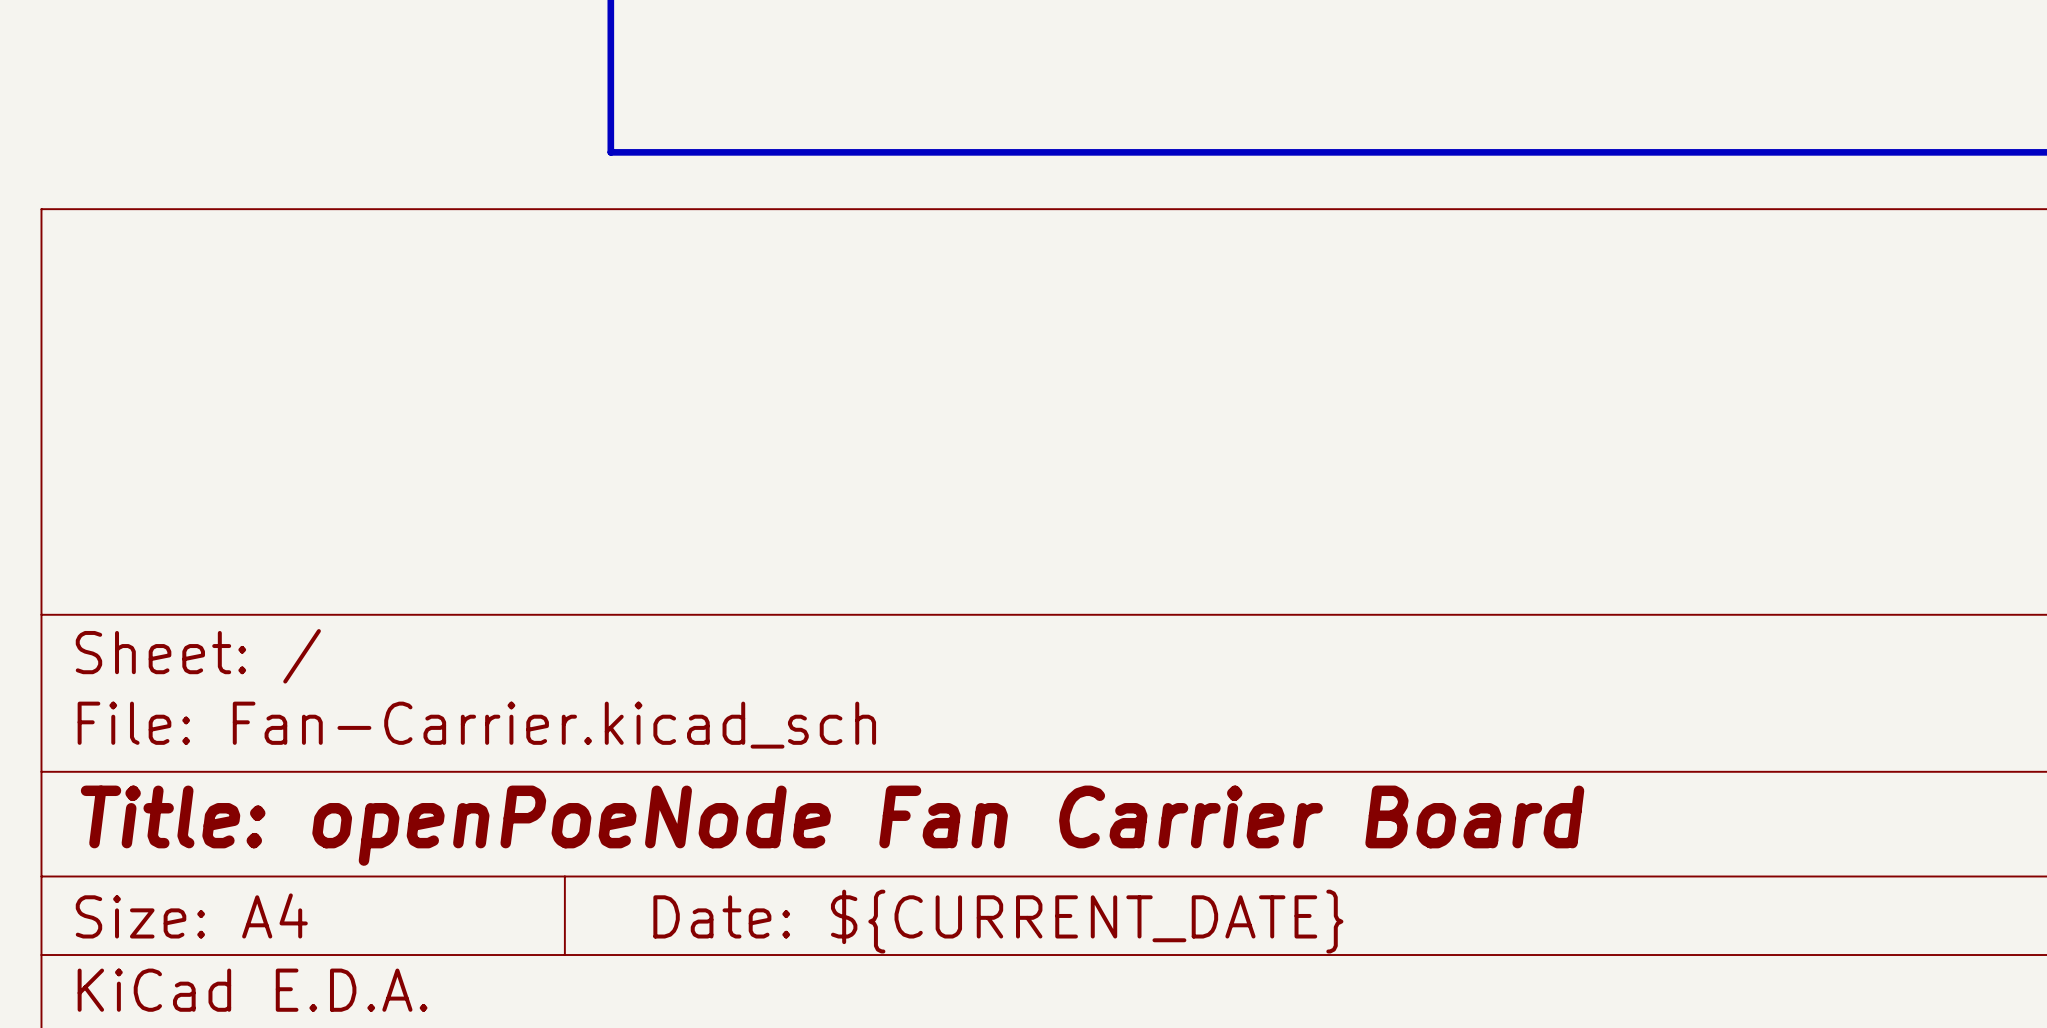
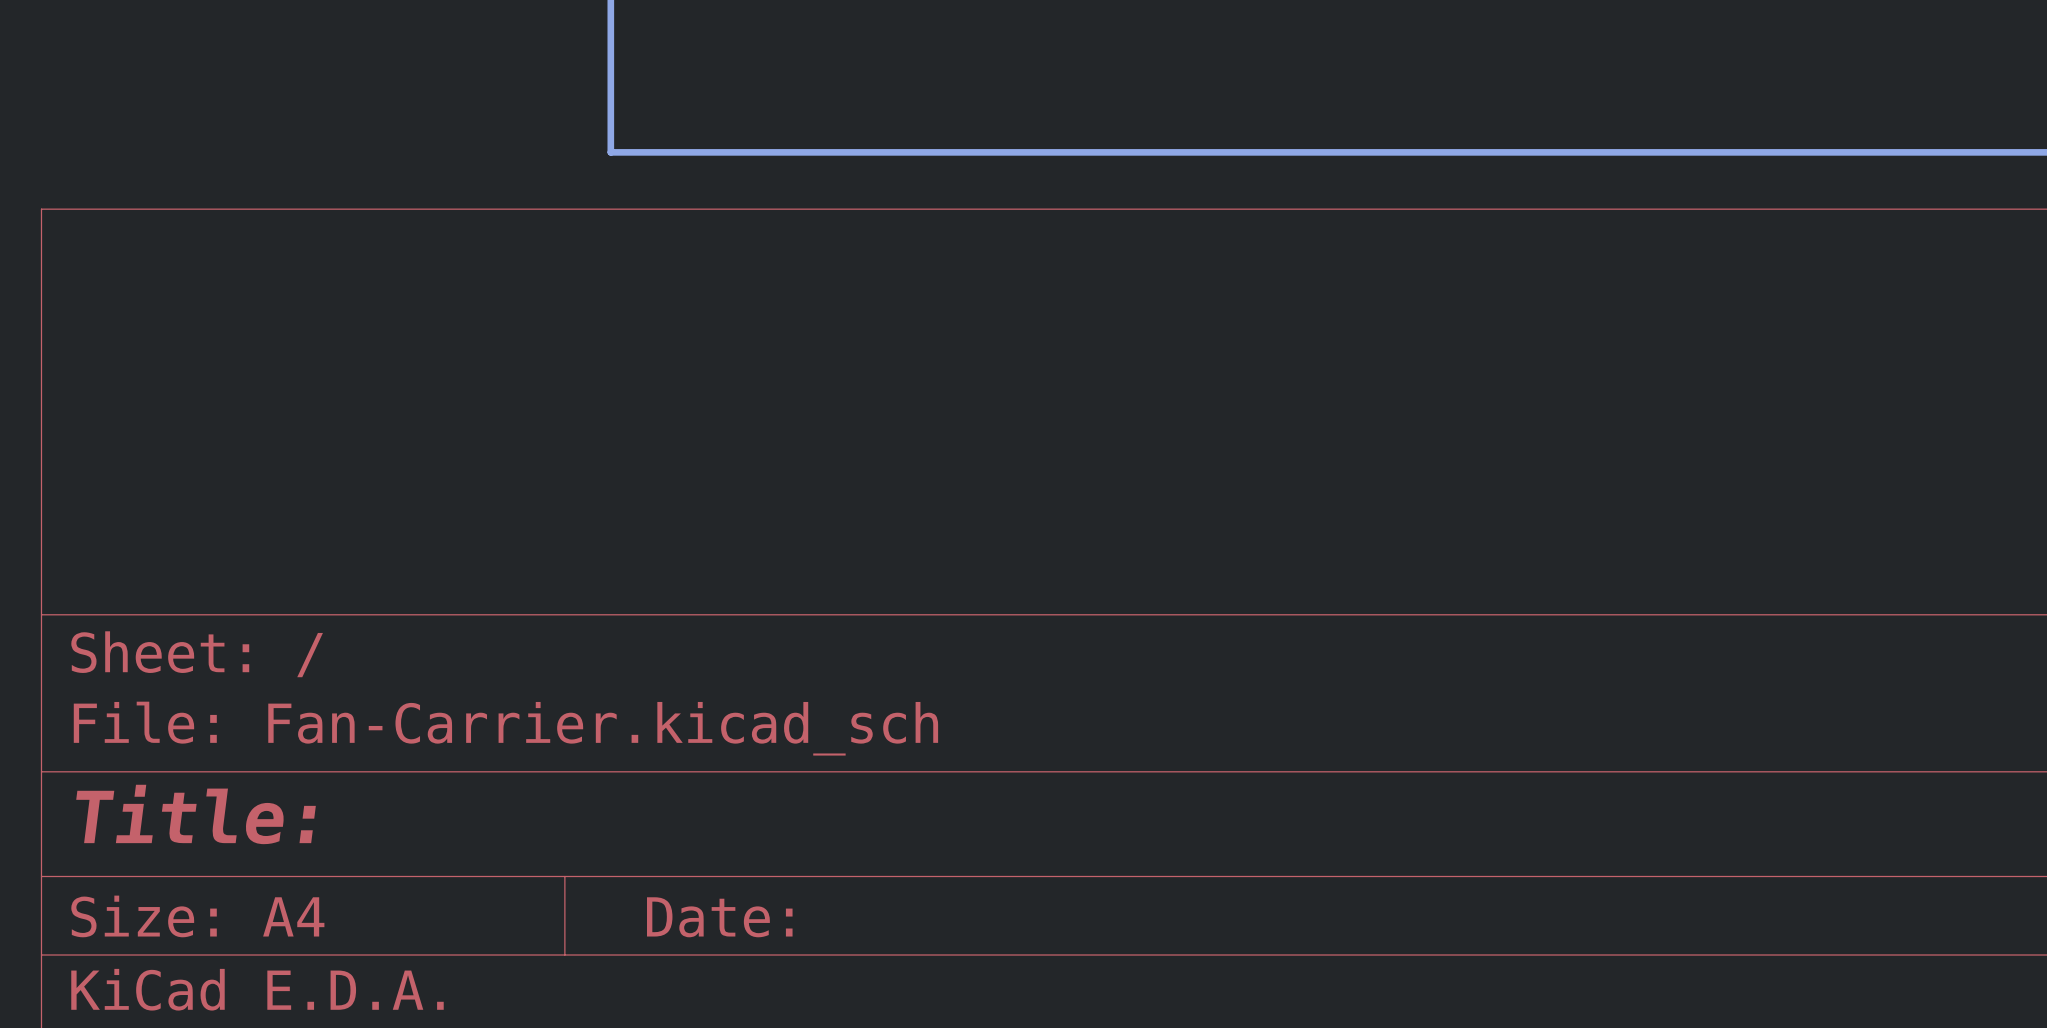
title block: Title: openPoeNode Fan Carrier Board (832, 825) -> Title: (196, 814)
title block: Date: ${CURRENT_DATE} (998, 921) -> Date: (719, 917)

